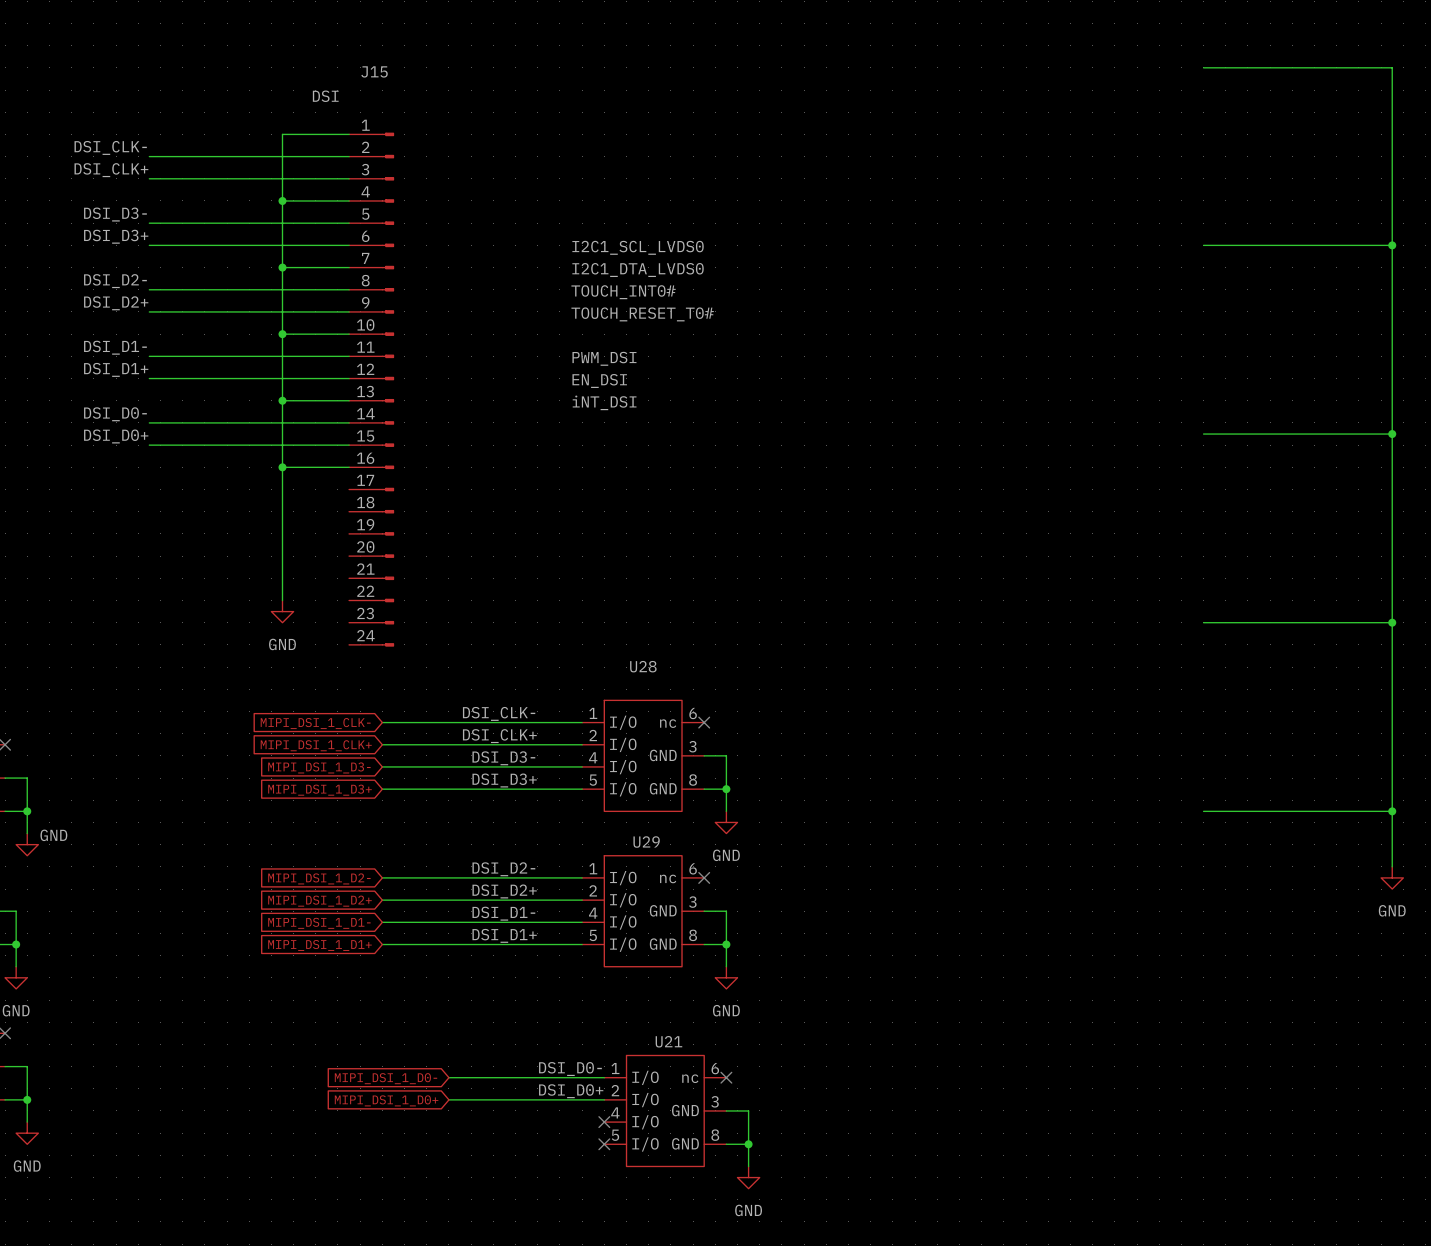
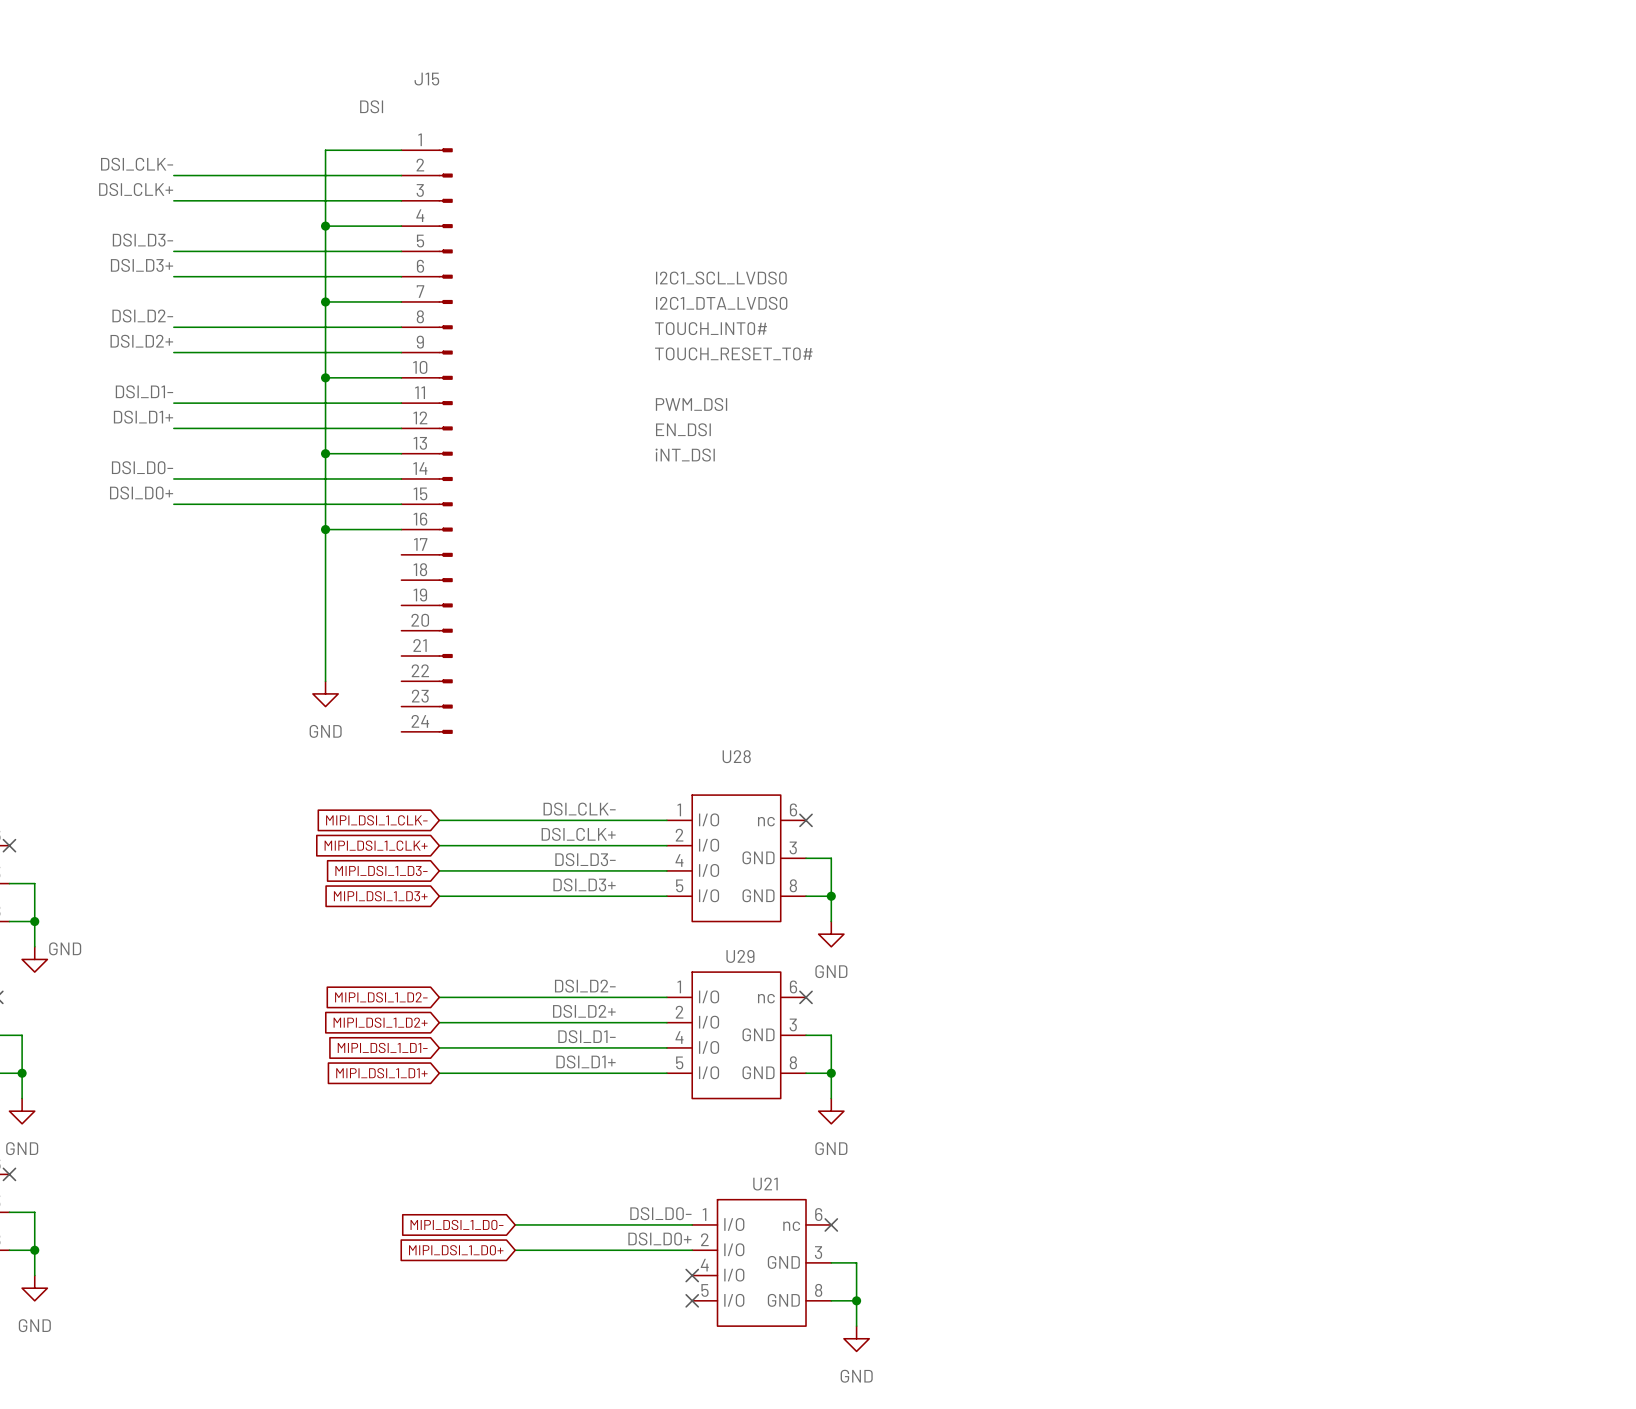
wire: (1203, 67) (1392, 67) (1392, 866) -> none
wire: (1203, 245) (1392, 245) -> none
junction: (1392, 245) -> none
wire: (1203, 434) (1392, 434) -> none
junction: (1392, 434) -> none
wire: (1203, 622) (1392, 622) -> none
junction: (1392, 622) -> none
wire: (1203, 811) (1392, 811) -> none
junction: (1392, 811) -> none
power symbol: GND (1392, 877) -> none

